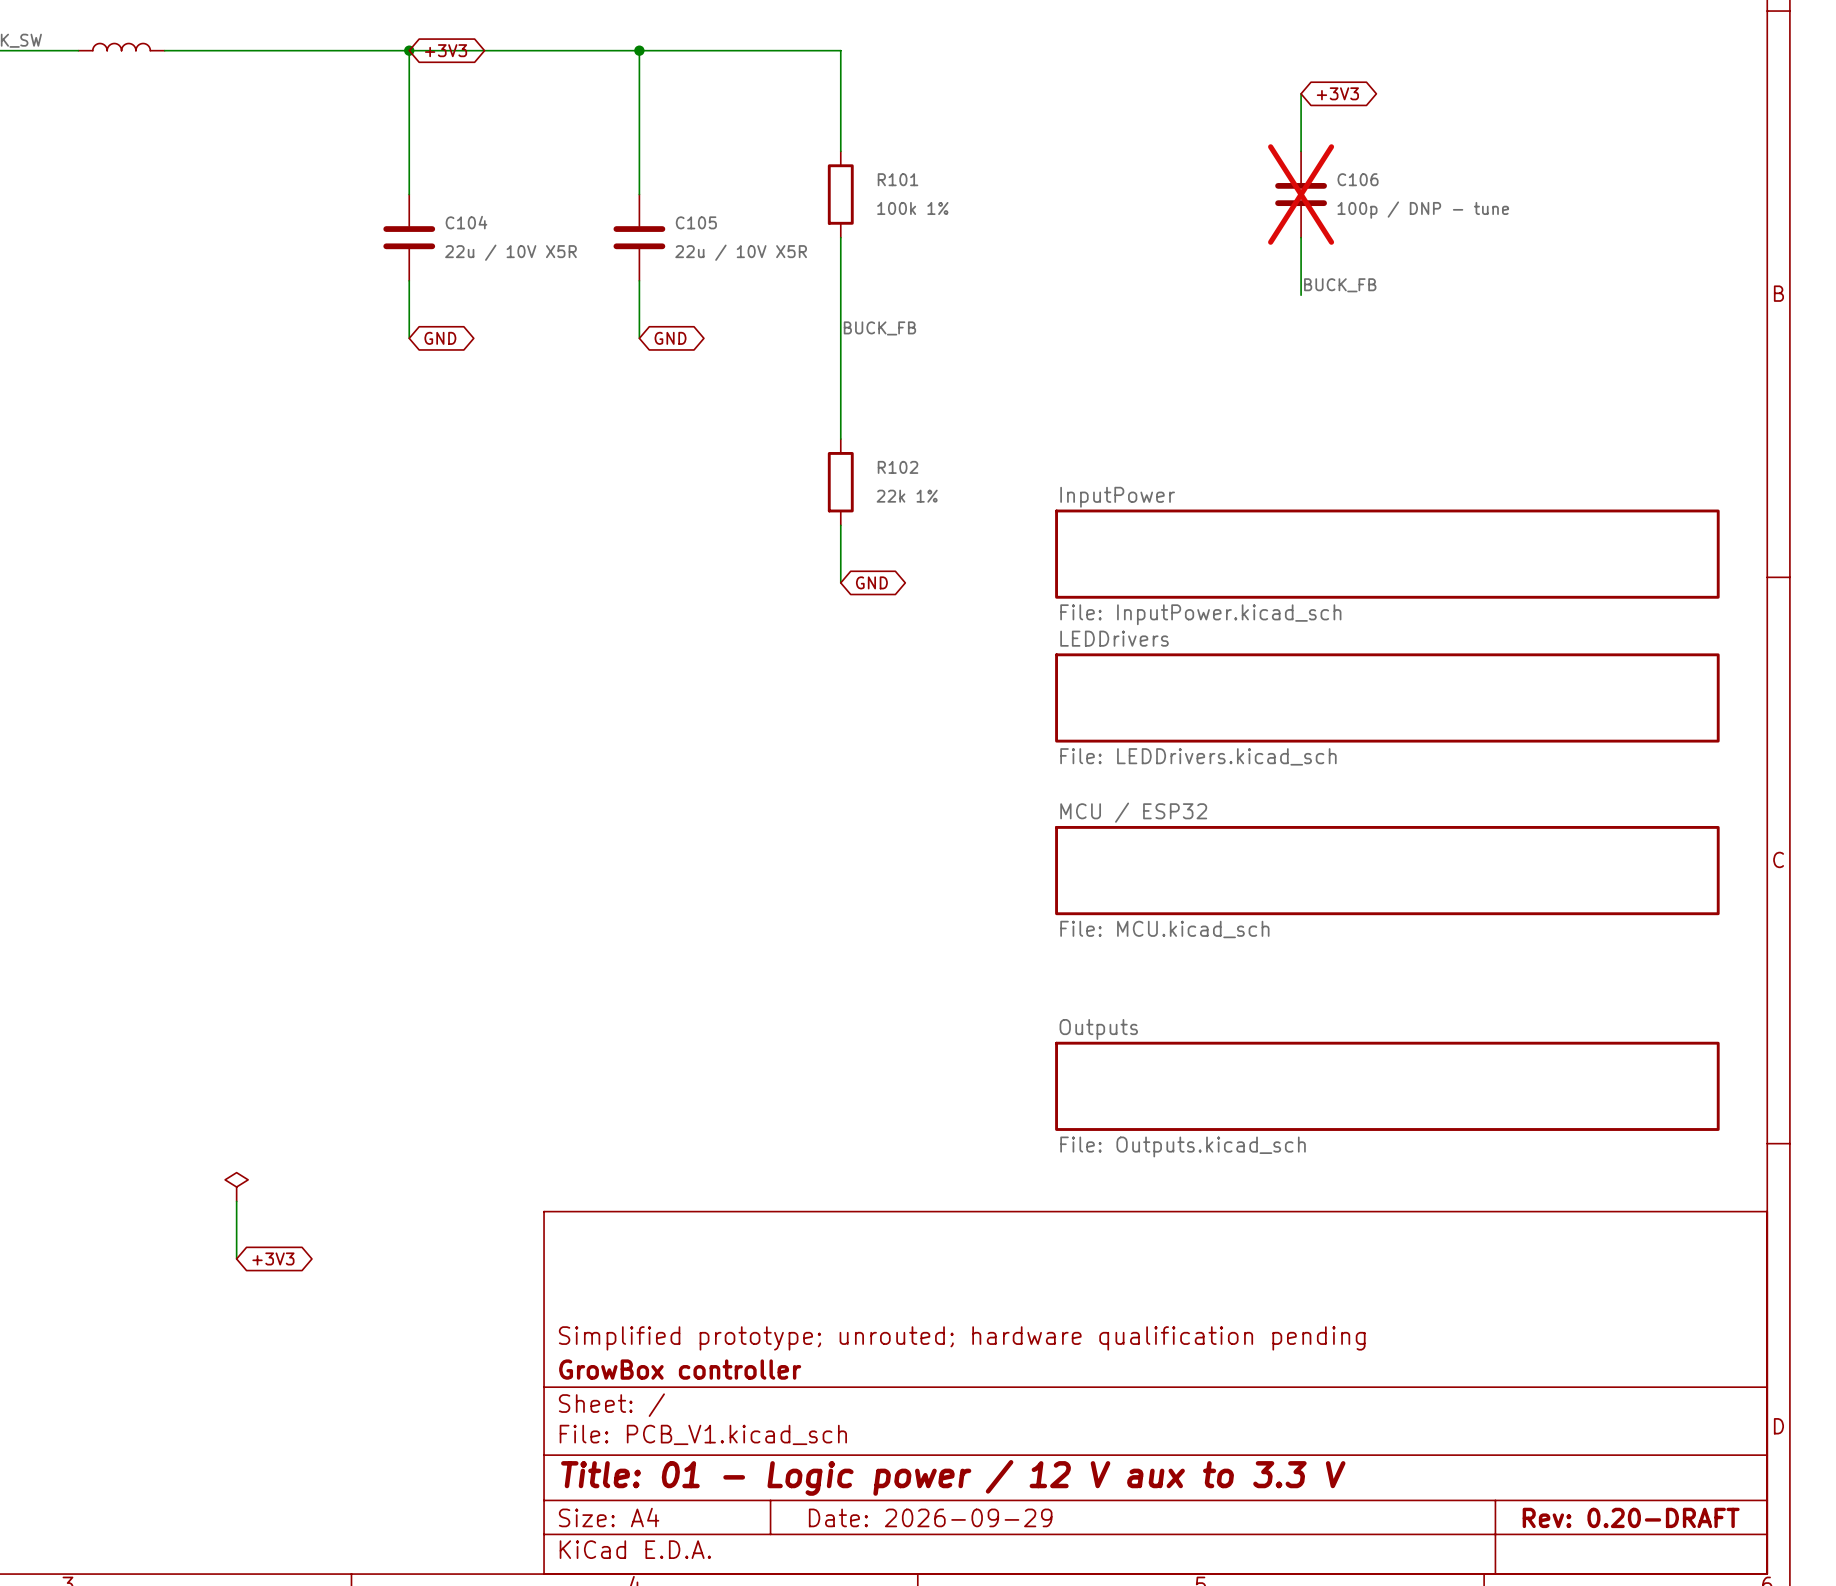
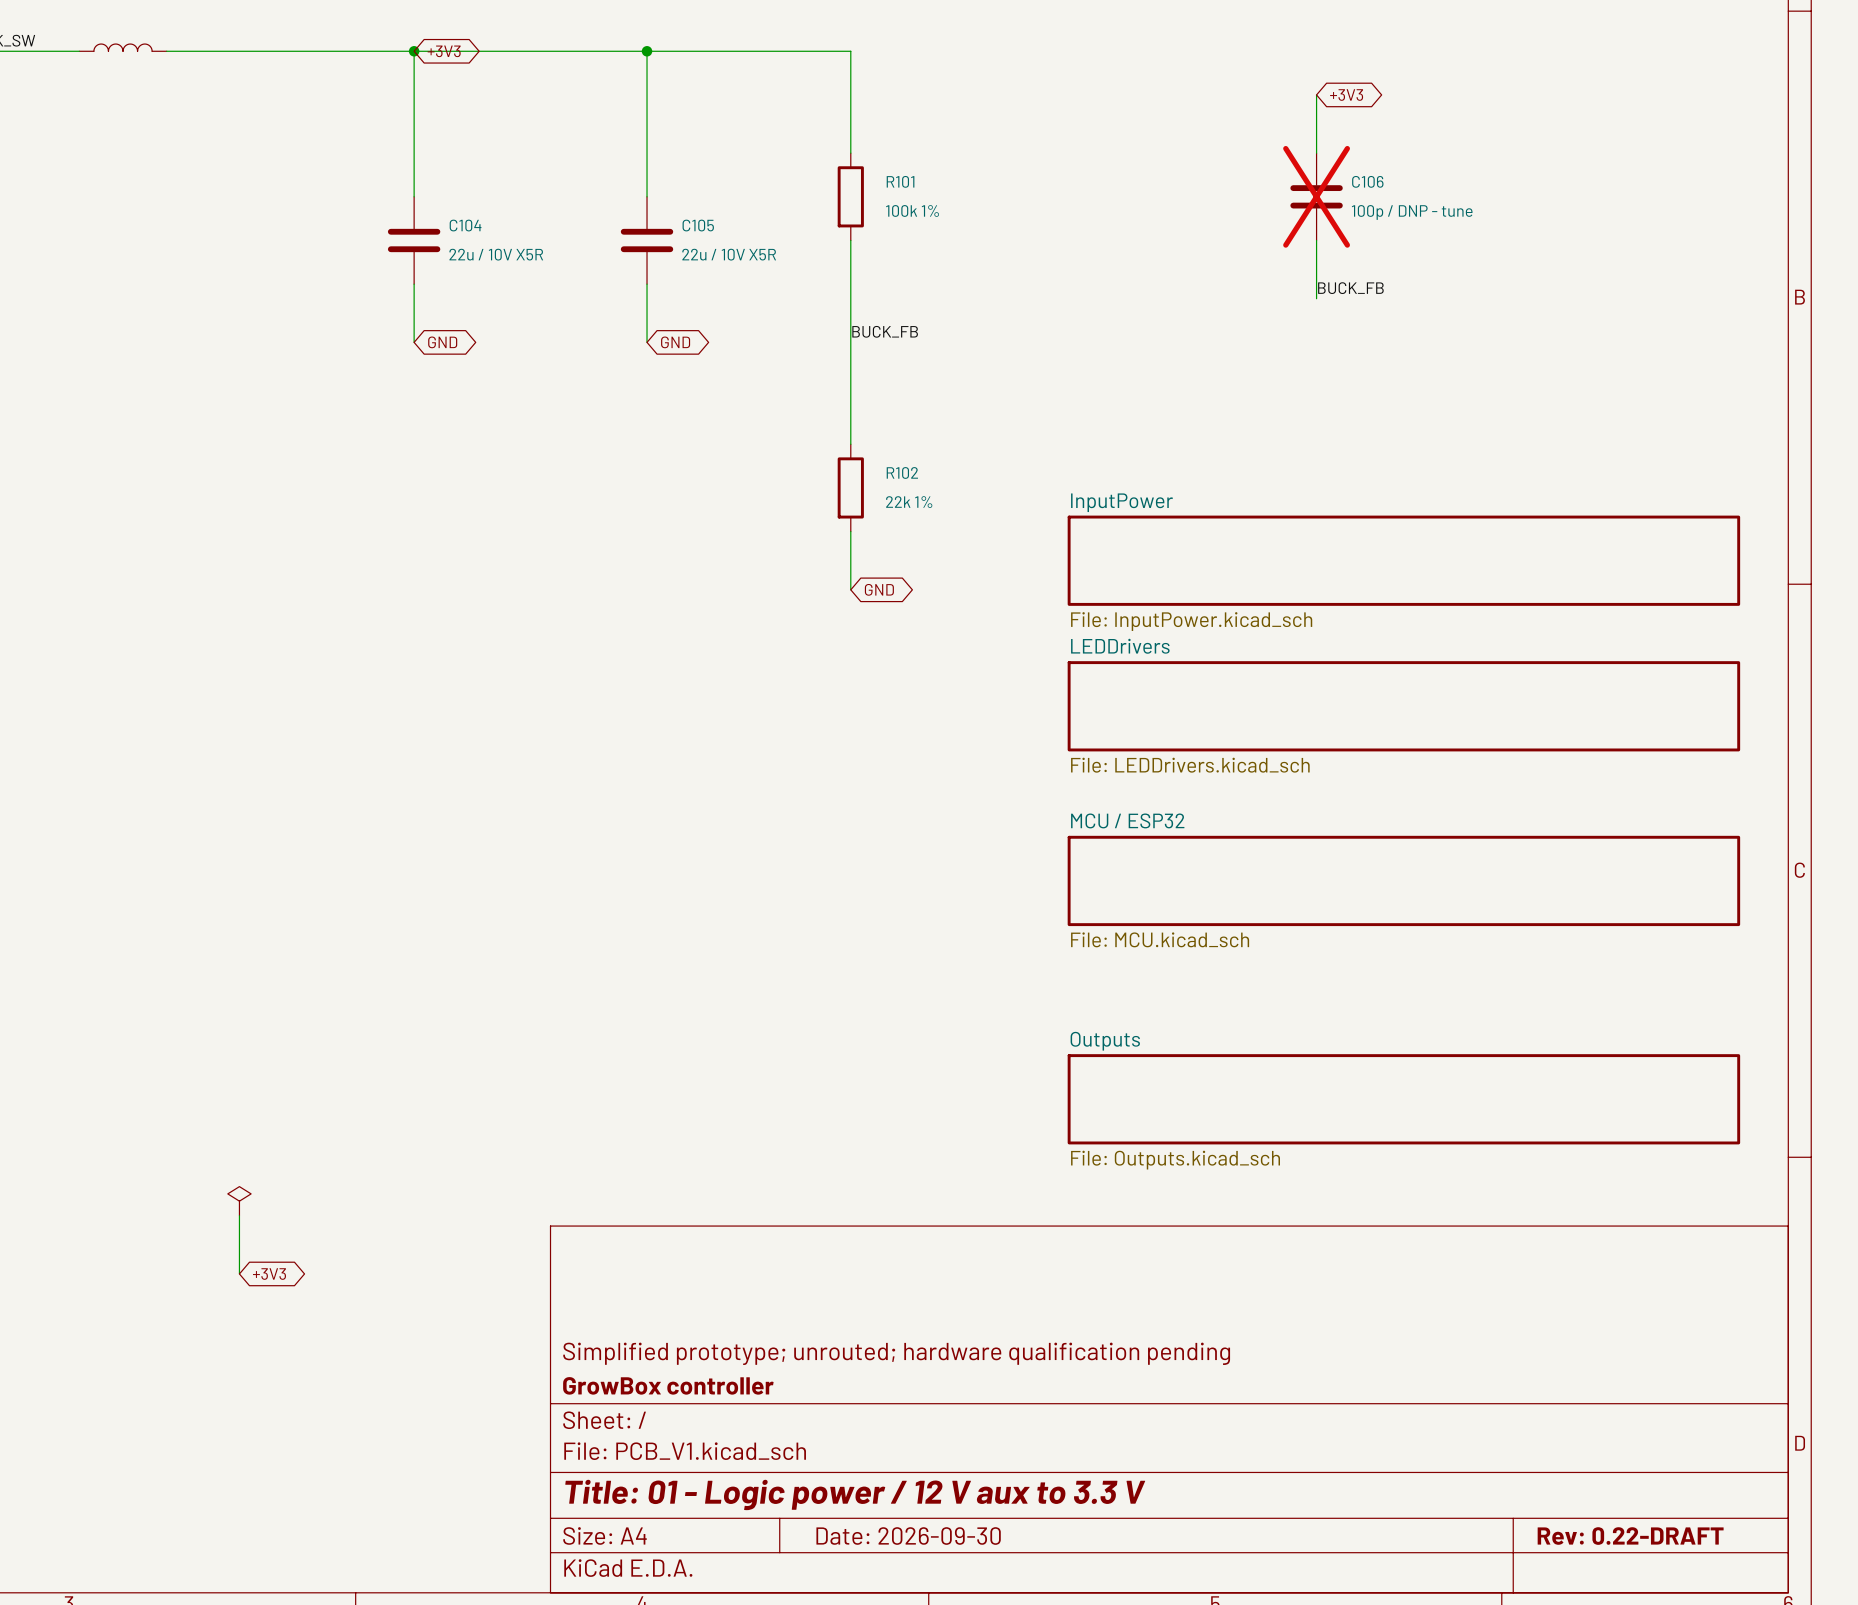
title block: Date: 2026-09-29 (930, 1517) -> Date: 2026-09-30 (908, 1536)
title block: Rev: 0.20-DRAFT (1631, 1517) -> Rev: 0.22-DRAFT (1630, 1536)

